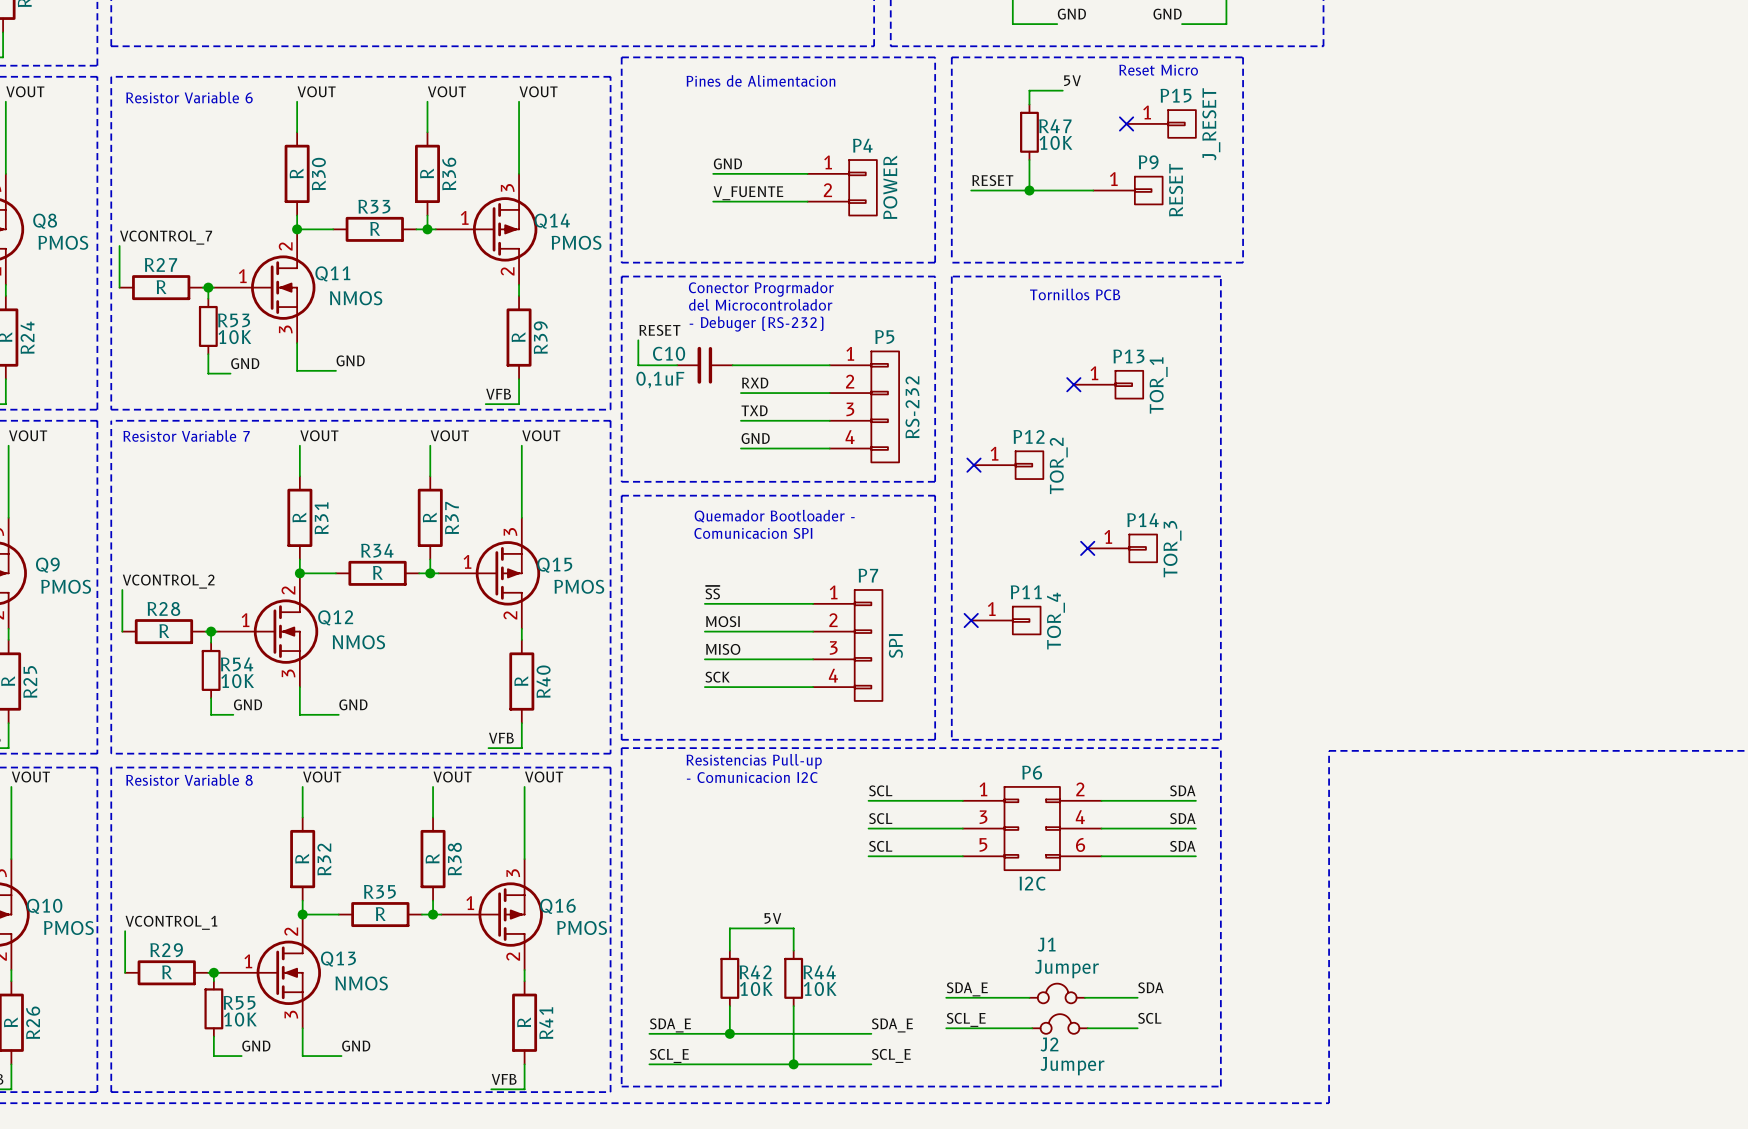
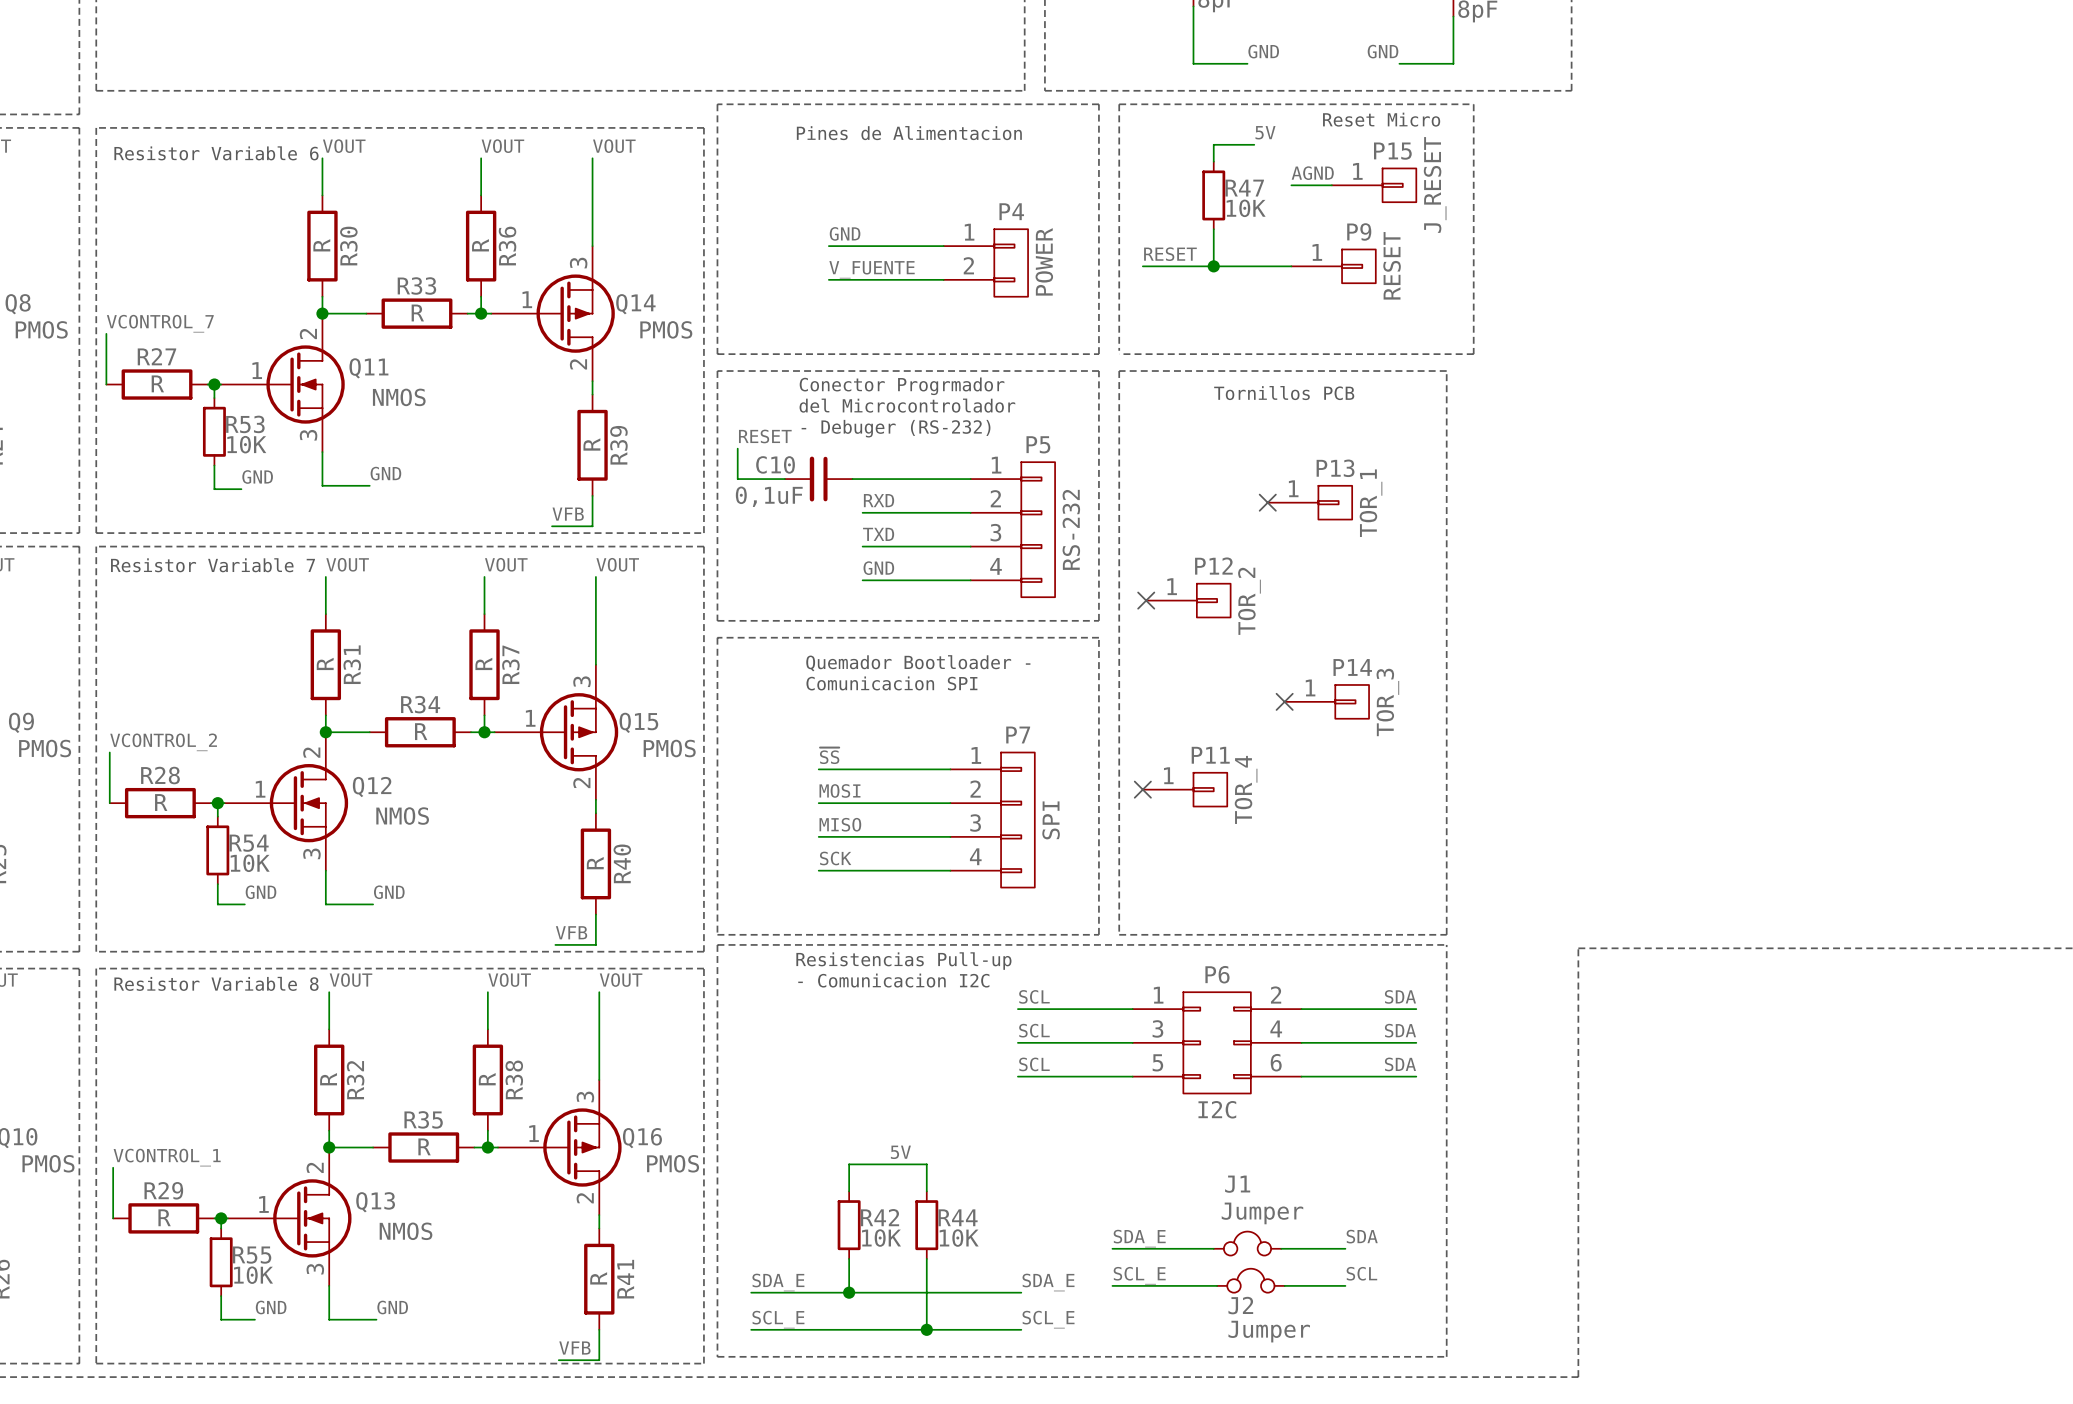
label: none -> AGND (1312, 173)
wire: none -> (1291, 185) (1331, 185)
no-connect mark: (1126, 123) -> none

